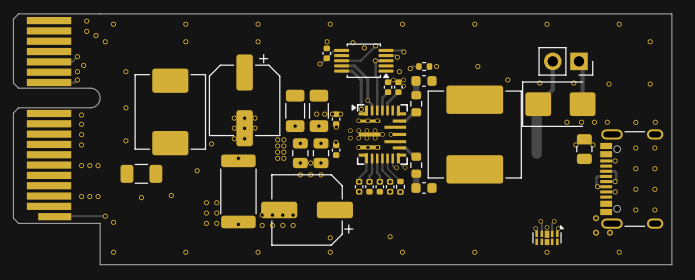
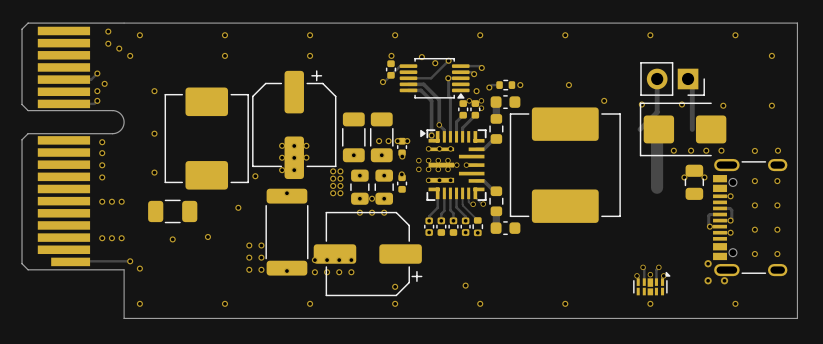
track: none -> (658, 129) (657, 131) (657, 187)
part position: (558, 104) -> (683, 129)
track: (536, 105) (536, 153) -> none

